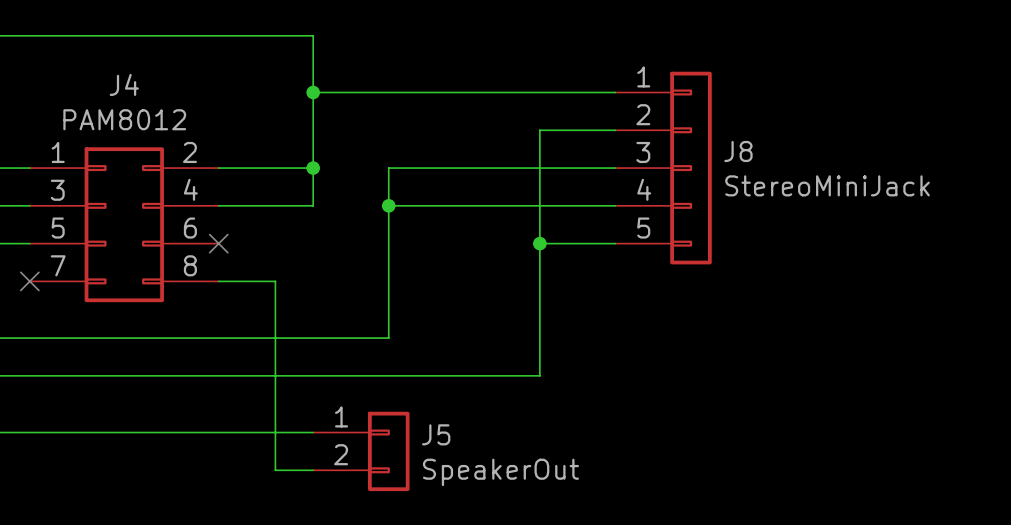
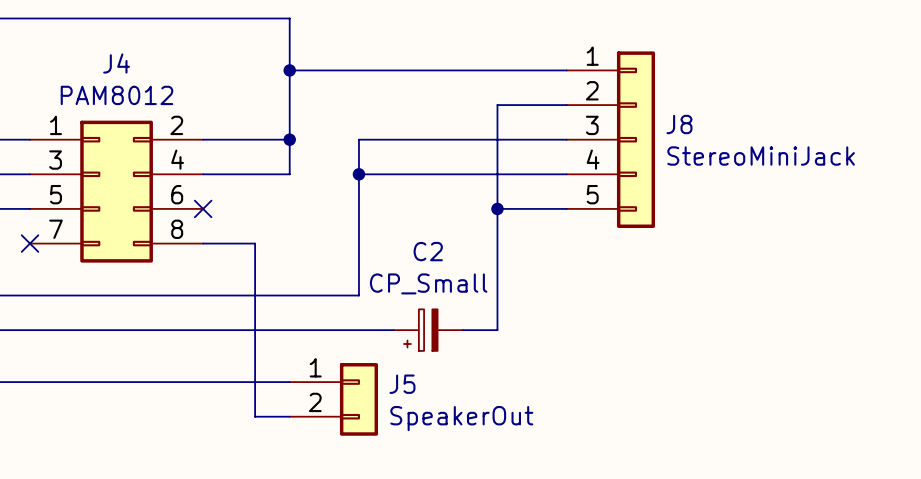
C2: none -> CP_Small (428, 330)

